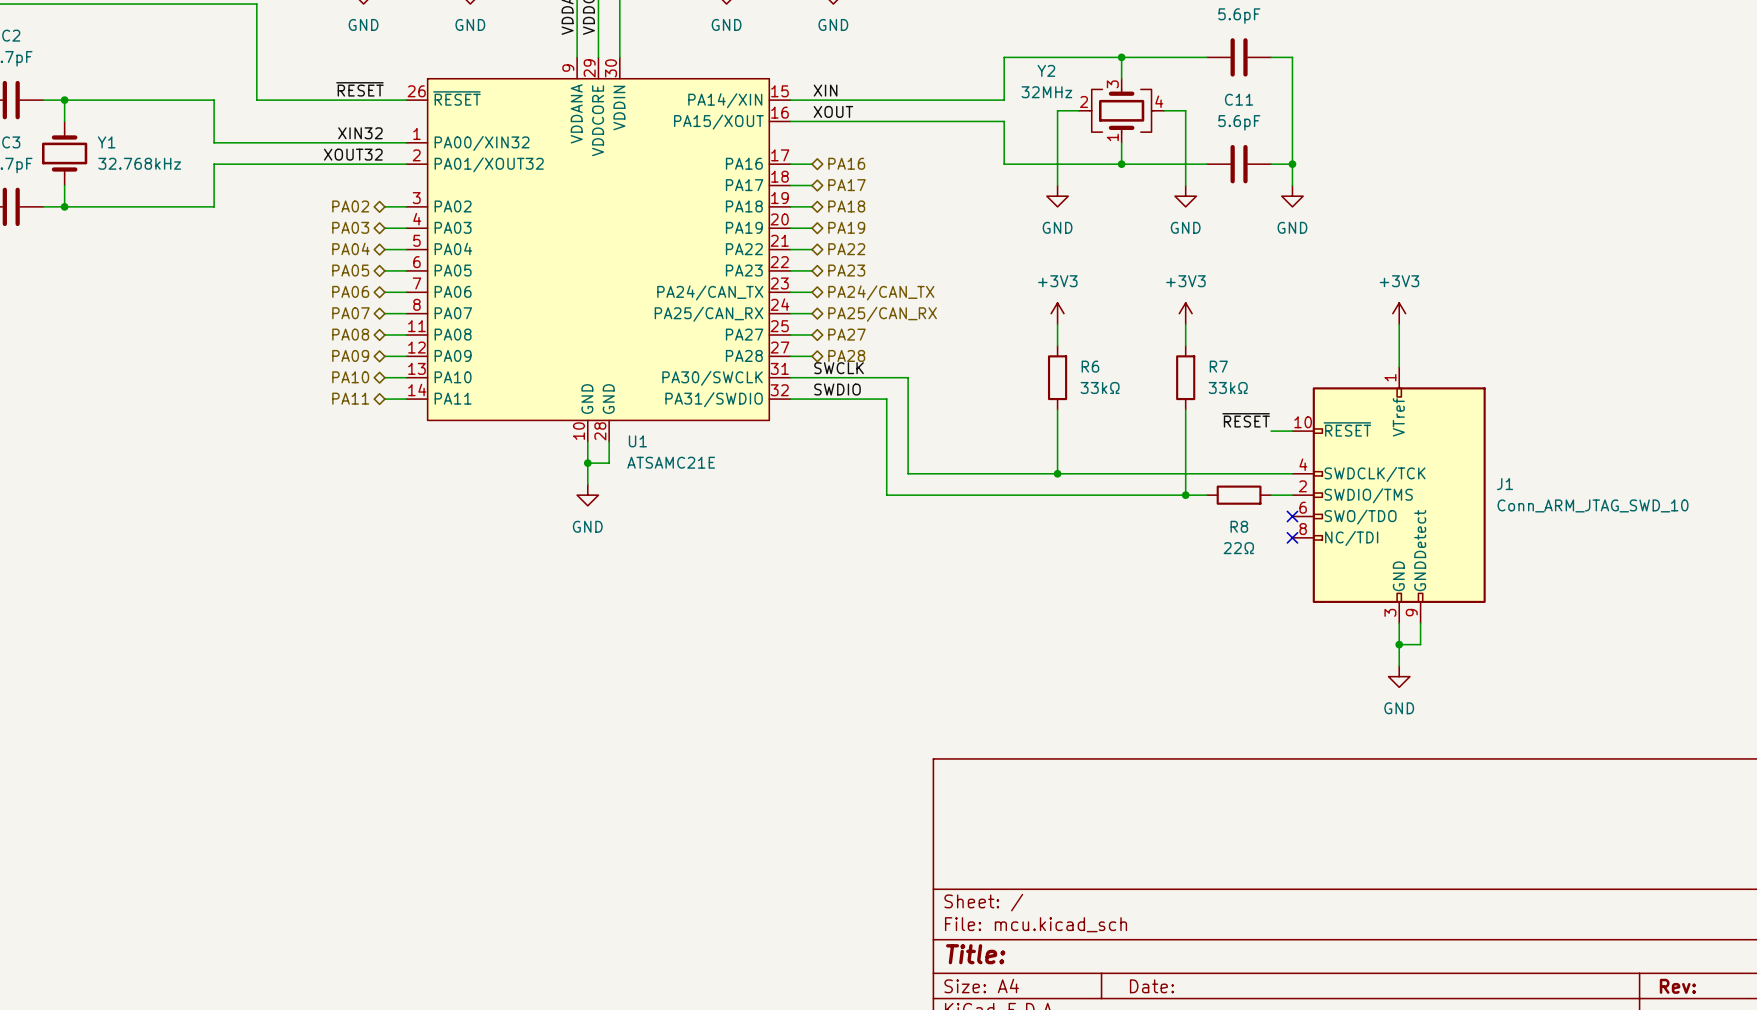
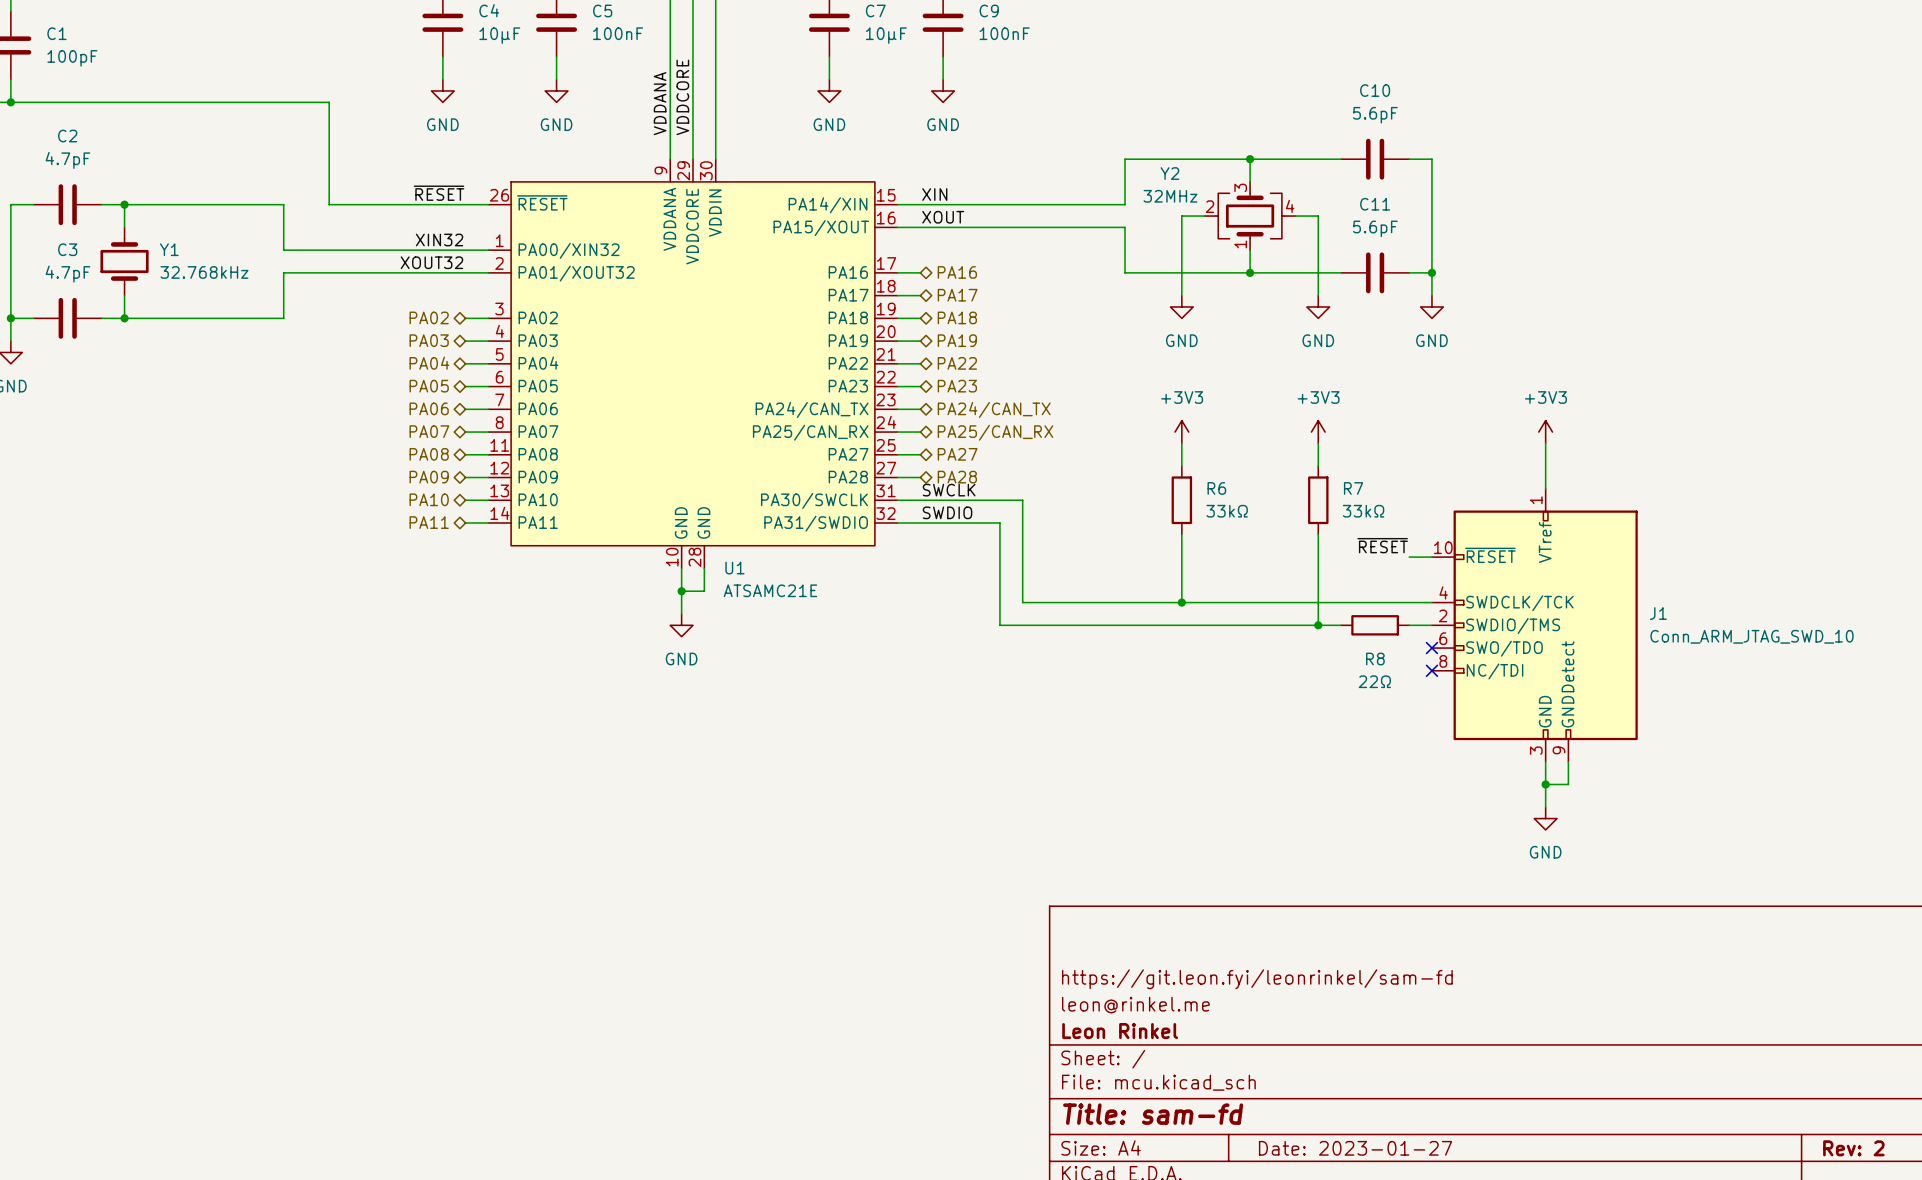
title block: none -> https://git.leon.fyi/leonrinkel/sam-fd (1257, 979)
title block: none -> leon@rinkel.me (1135, 1005)
title block: none -> Leon Rinkel (1120, 1031)
title block: Title: (975, 954) -> Title: sam-fd (1153, 1114)
title block: Date: (1151, 986) -> Date: 2023-01-27 (1355, 1148)
title block: Rev: (1677, 986) -> Rev: 2 (1853, 1148)

